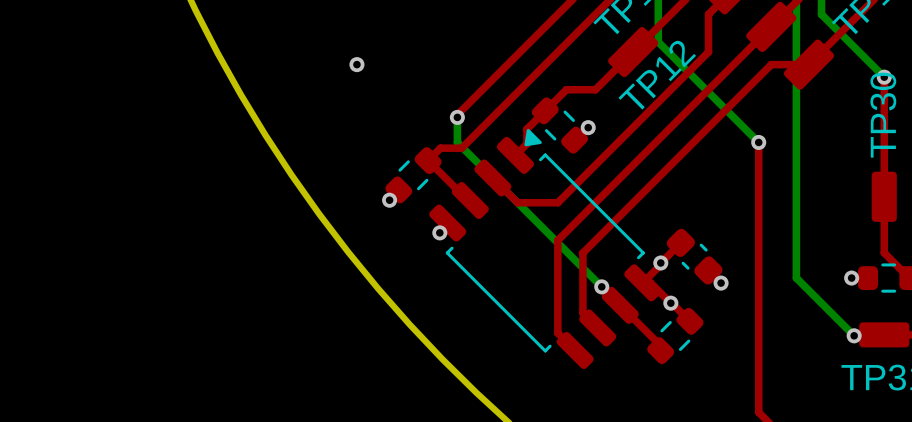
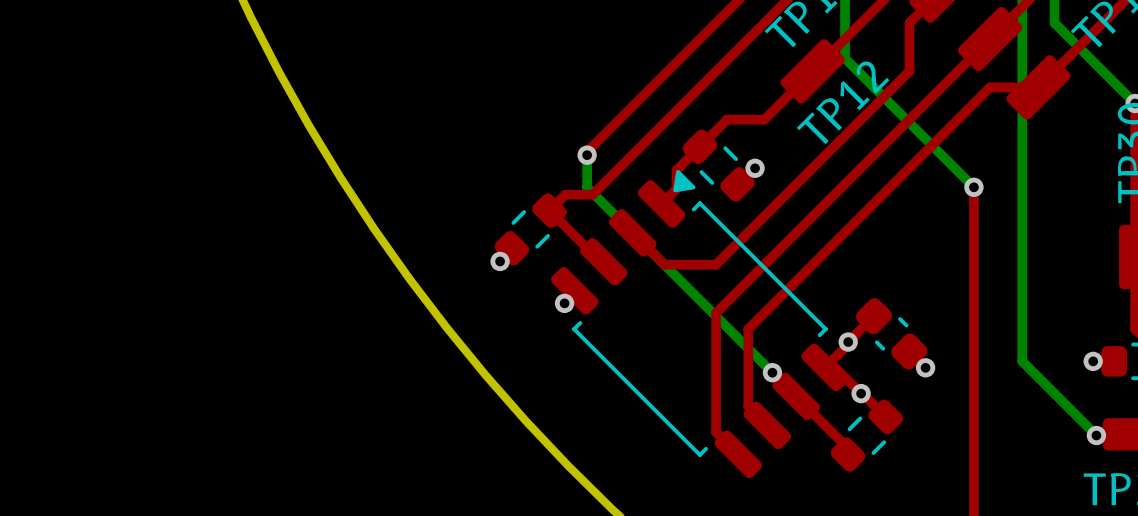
via: (356, 64) -> none

